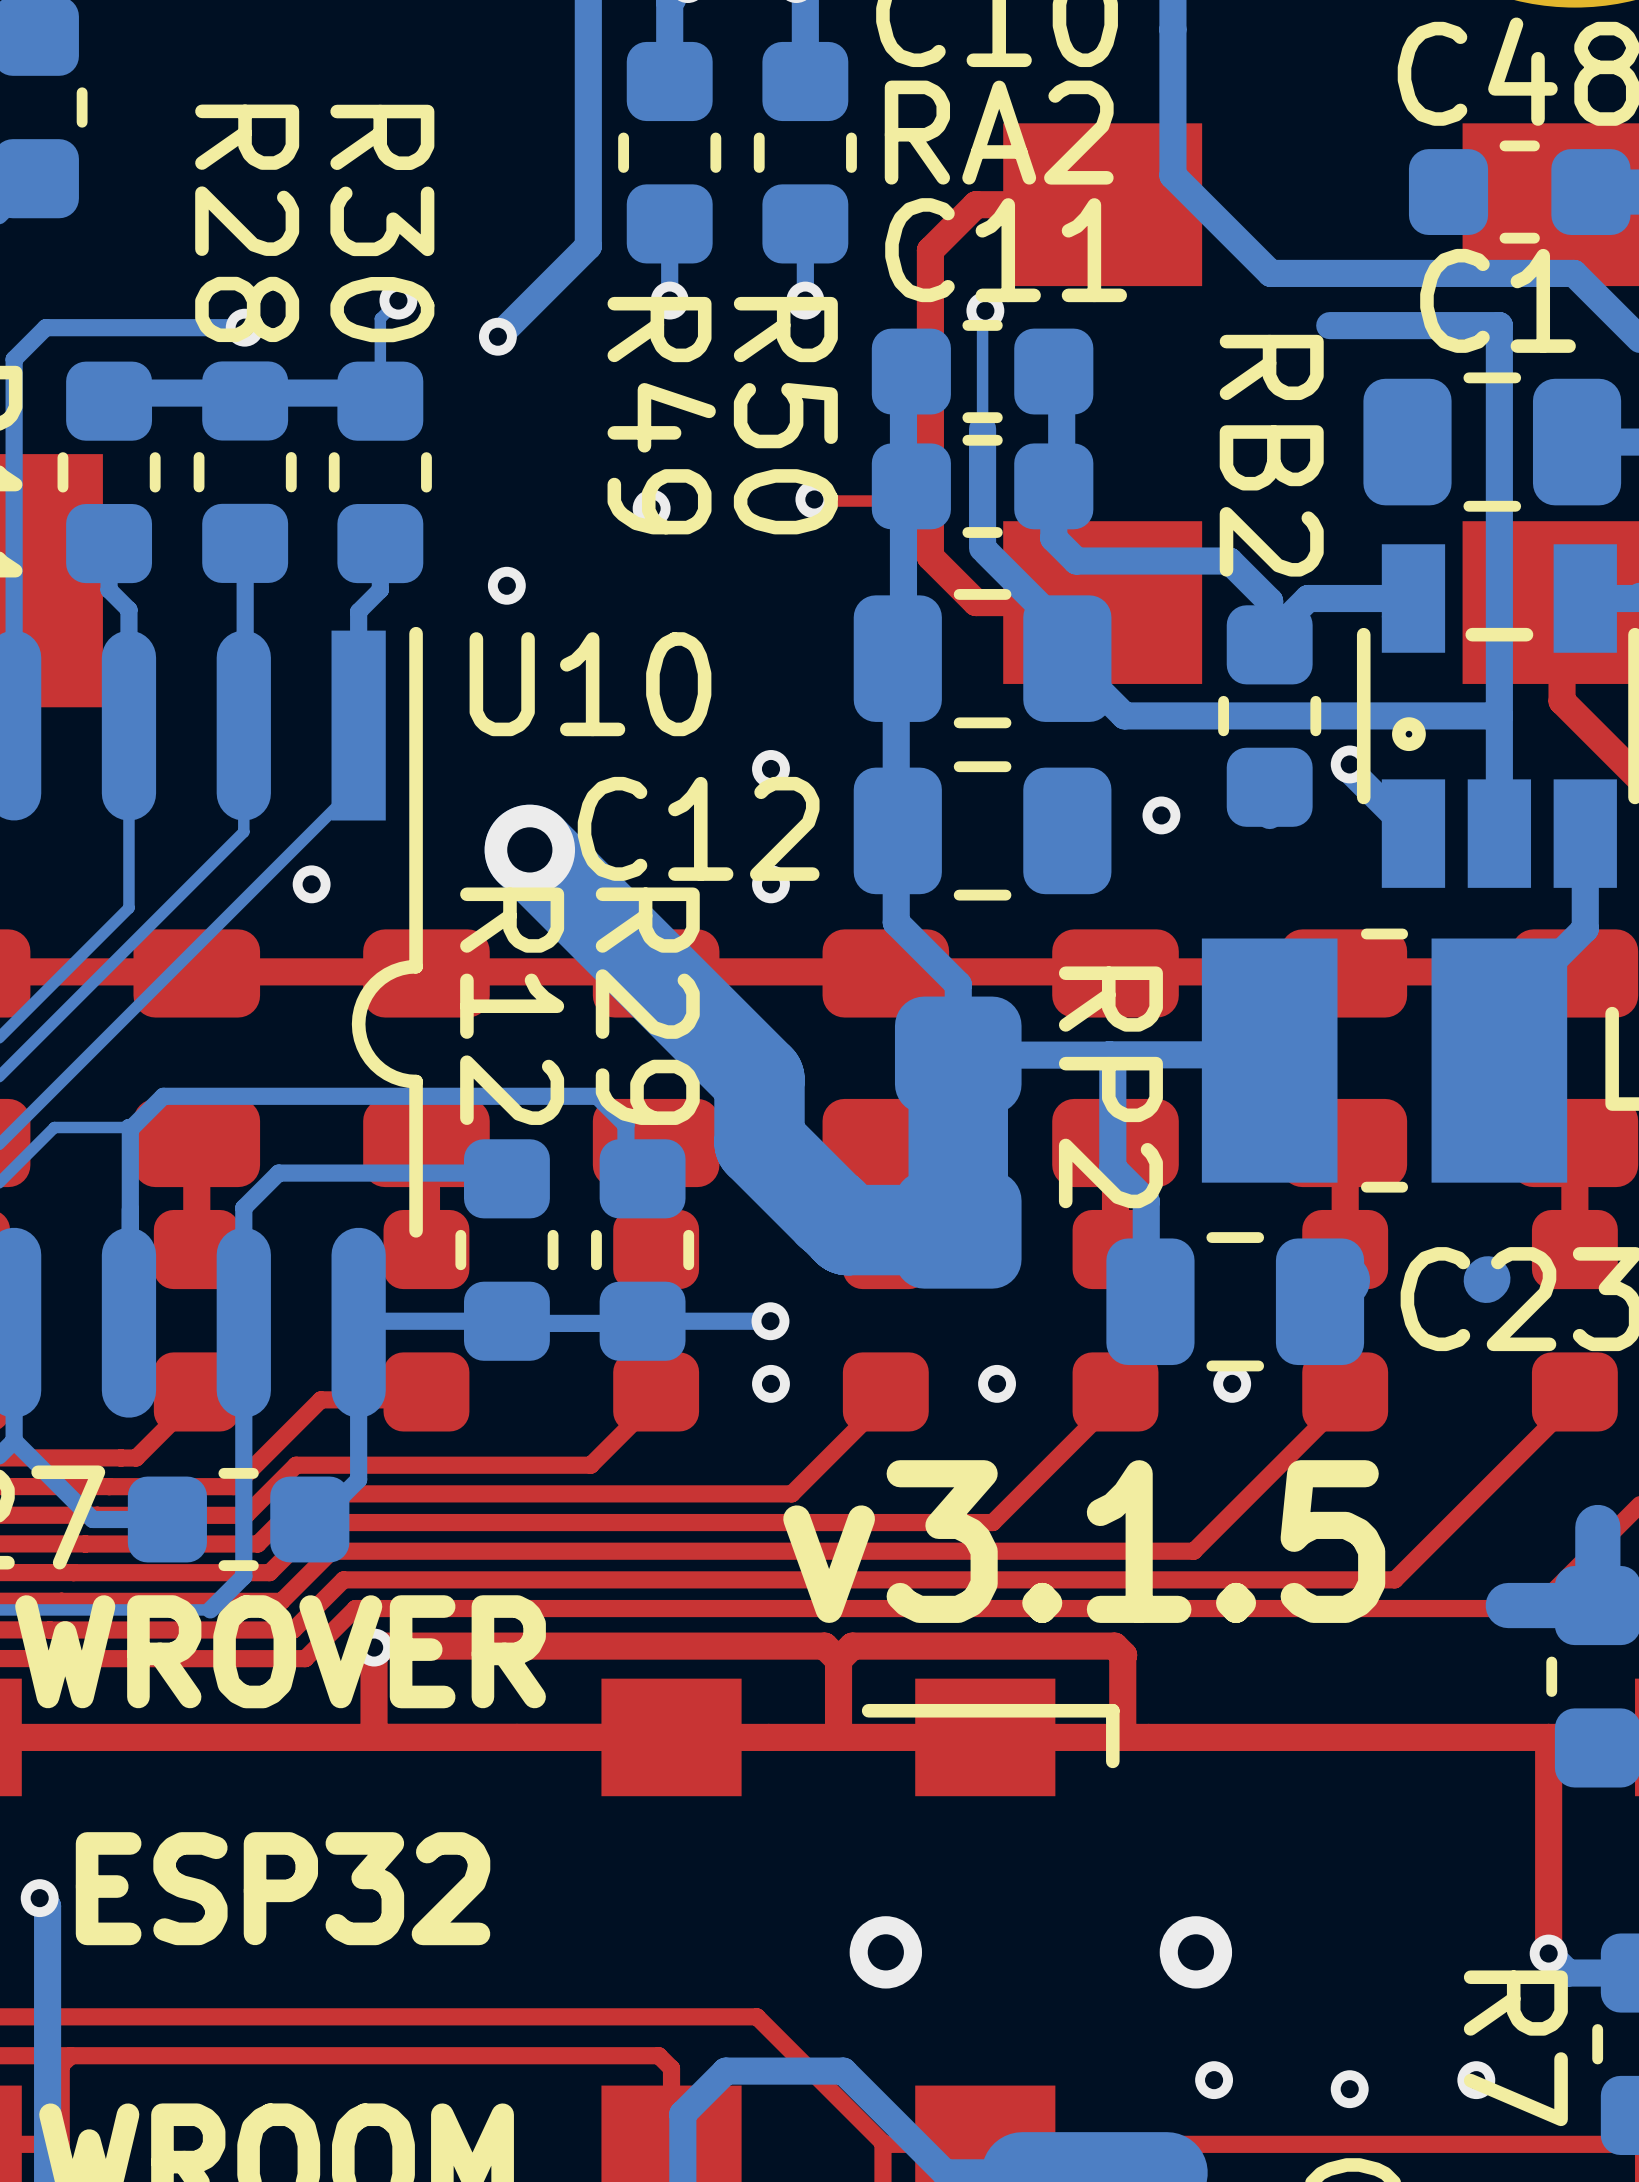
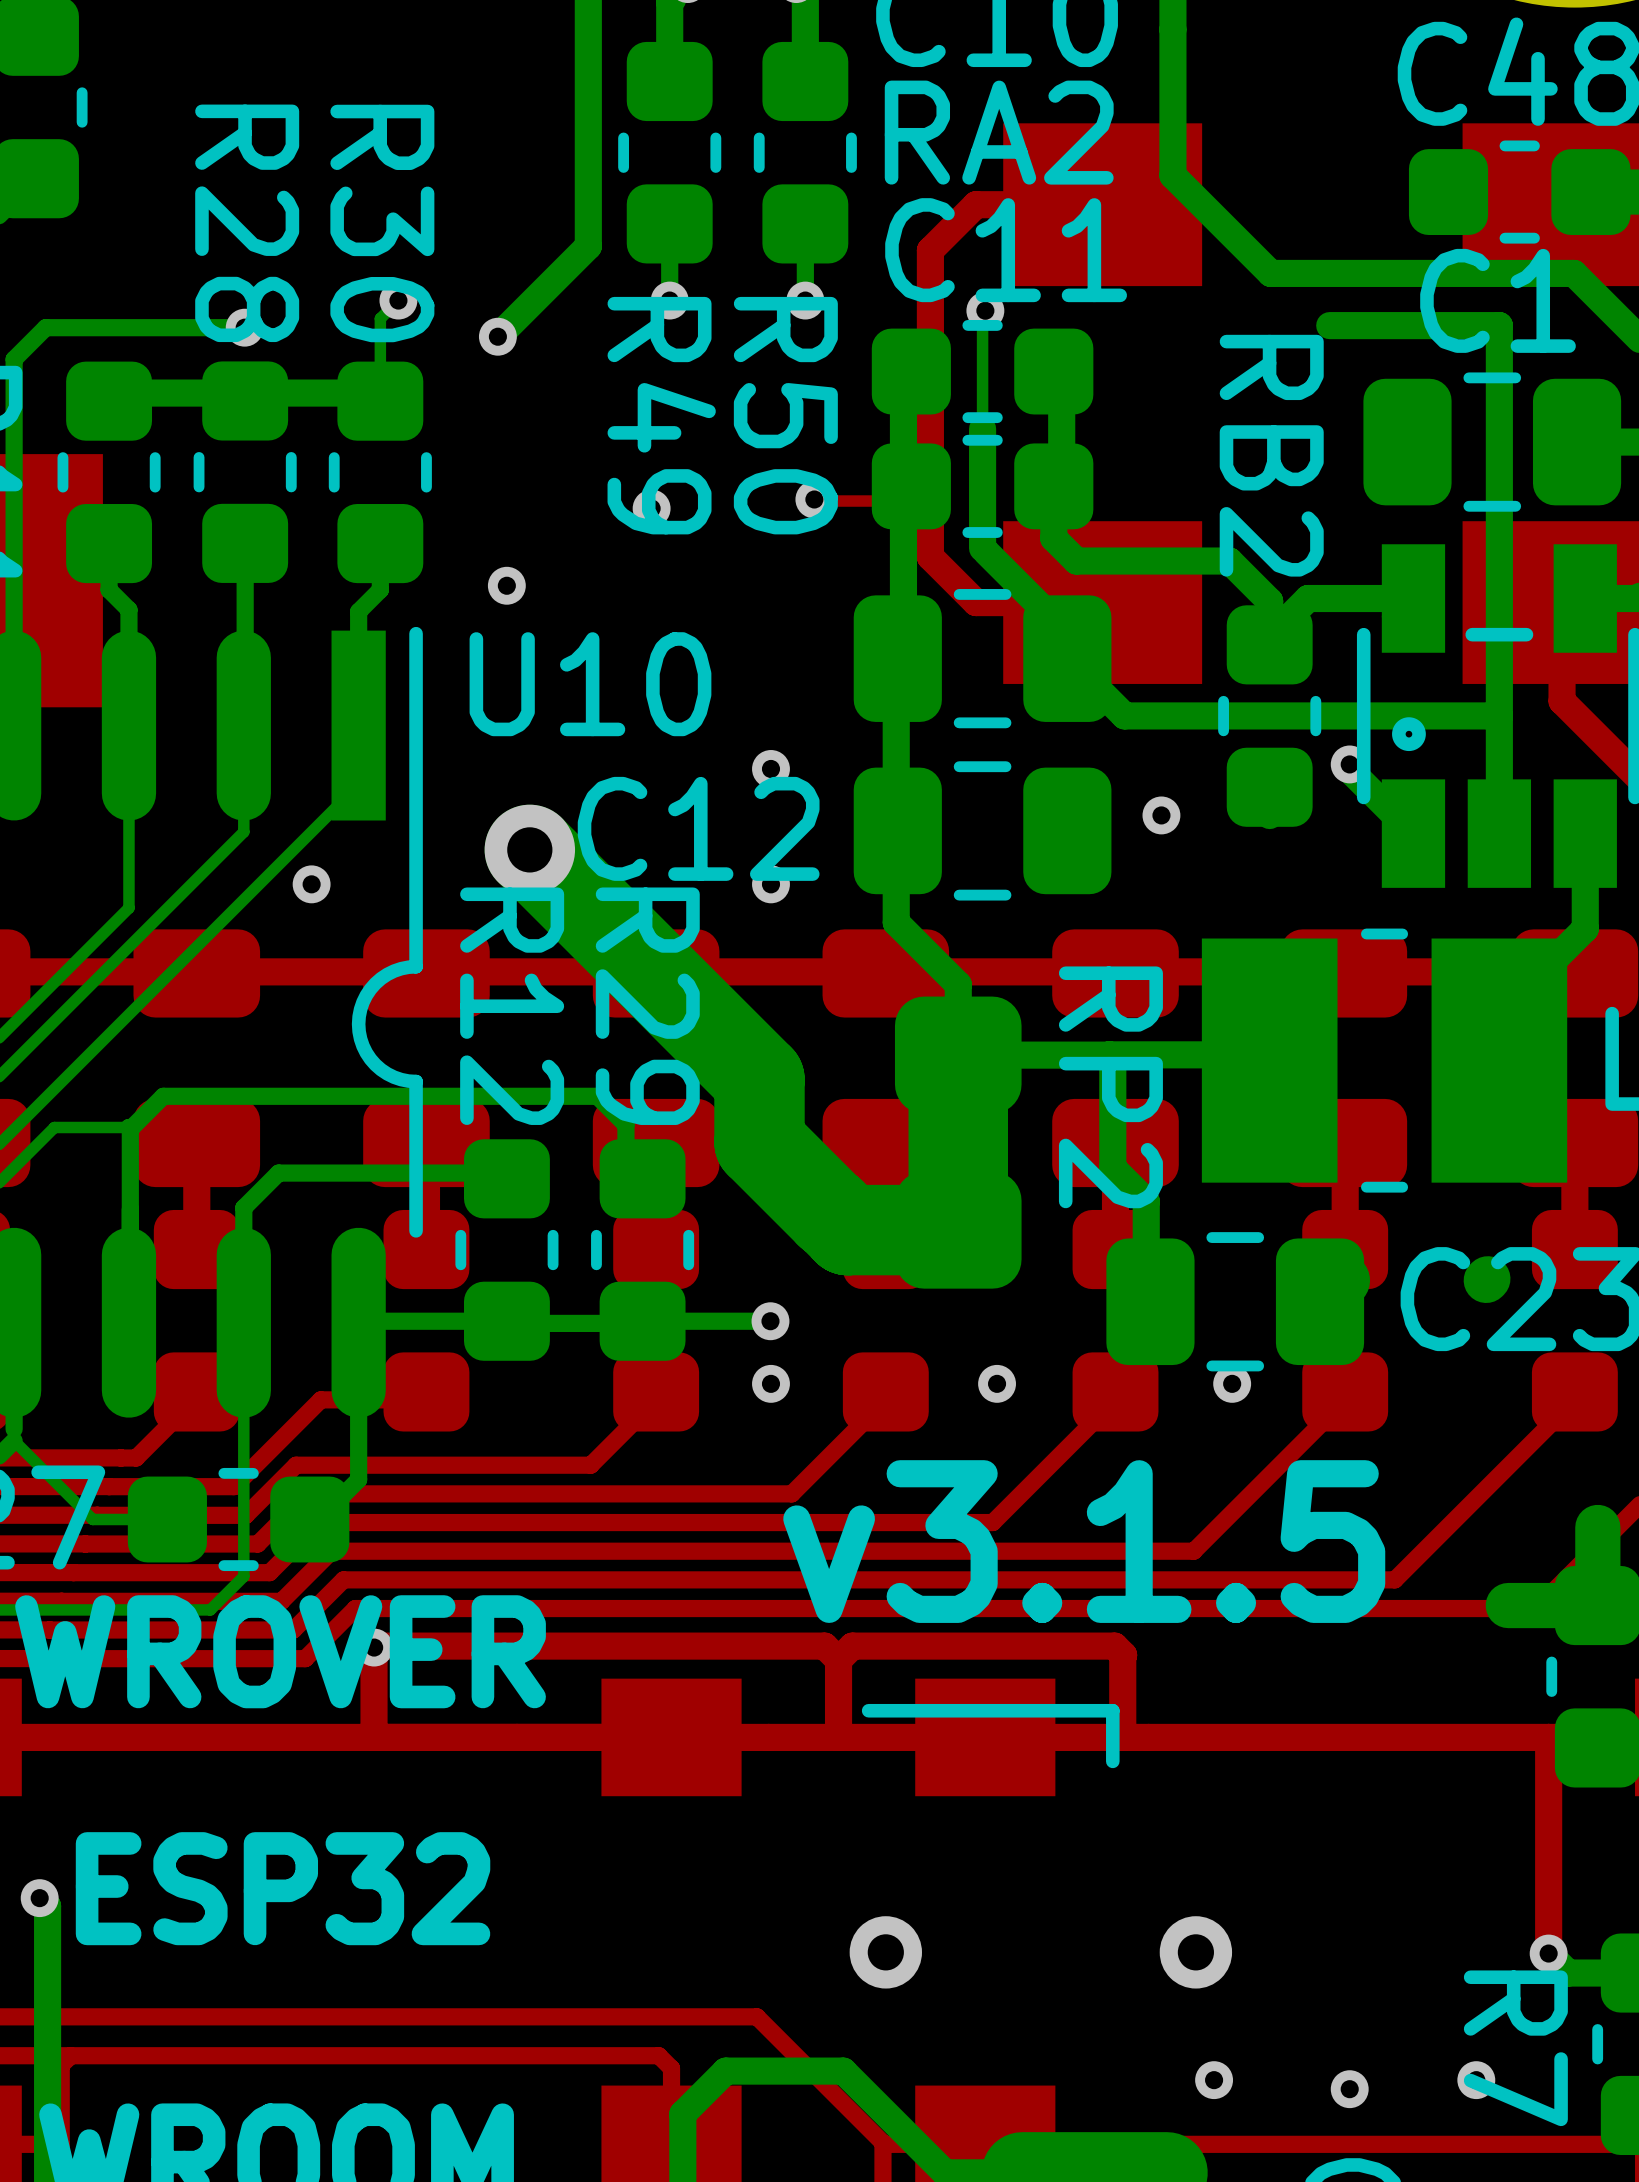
bottom track width: thick (243, 1322) (243, 1576) (210, 1609) -> thin (243, 1322) (243, 1576) (210, 1609)
bottom track width: thick (14, 1429) (14, 1440) (92, 1519) (167, 1519) -> thin (14, 1429) (14, 1440) (92, 1519) (167, 1519)

